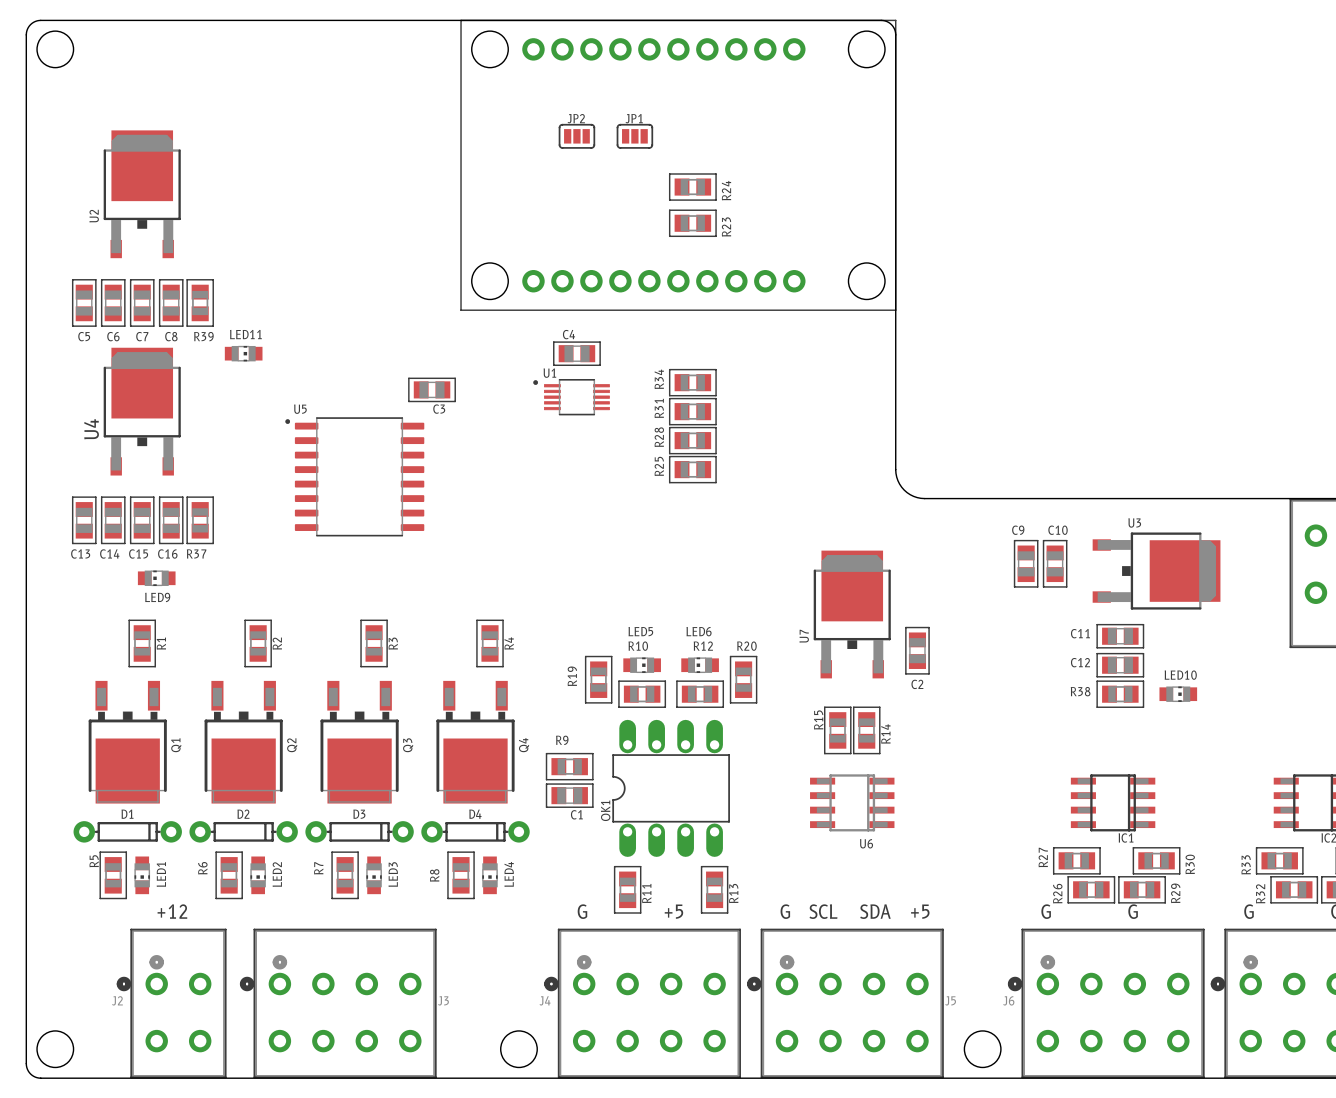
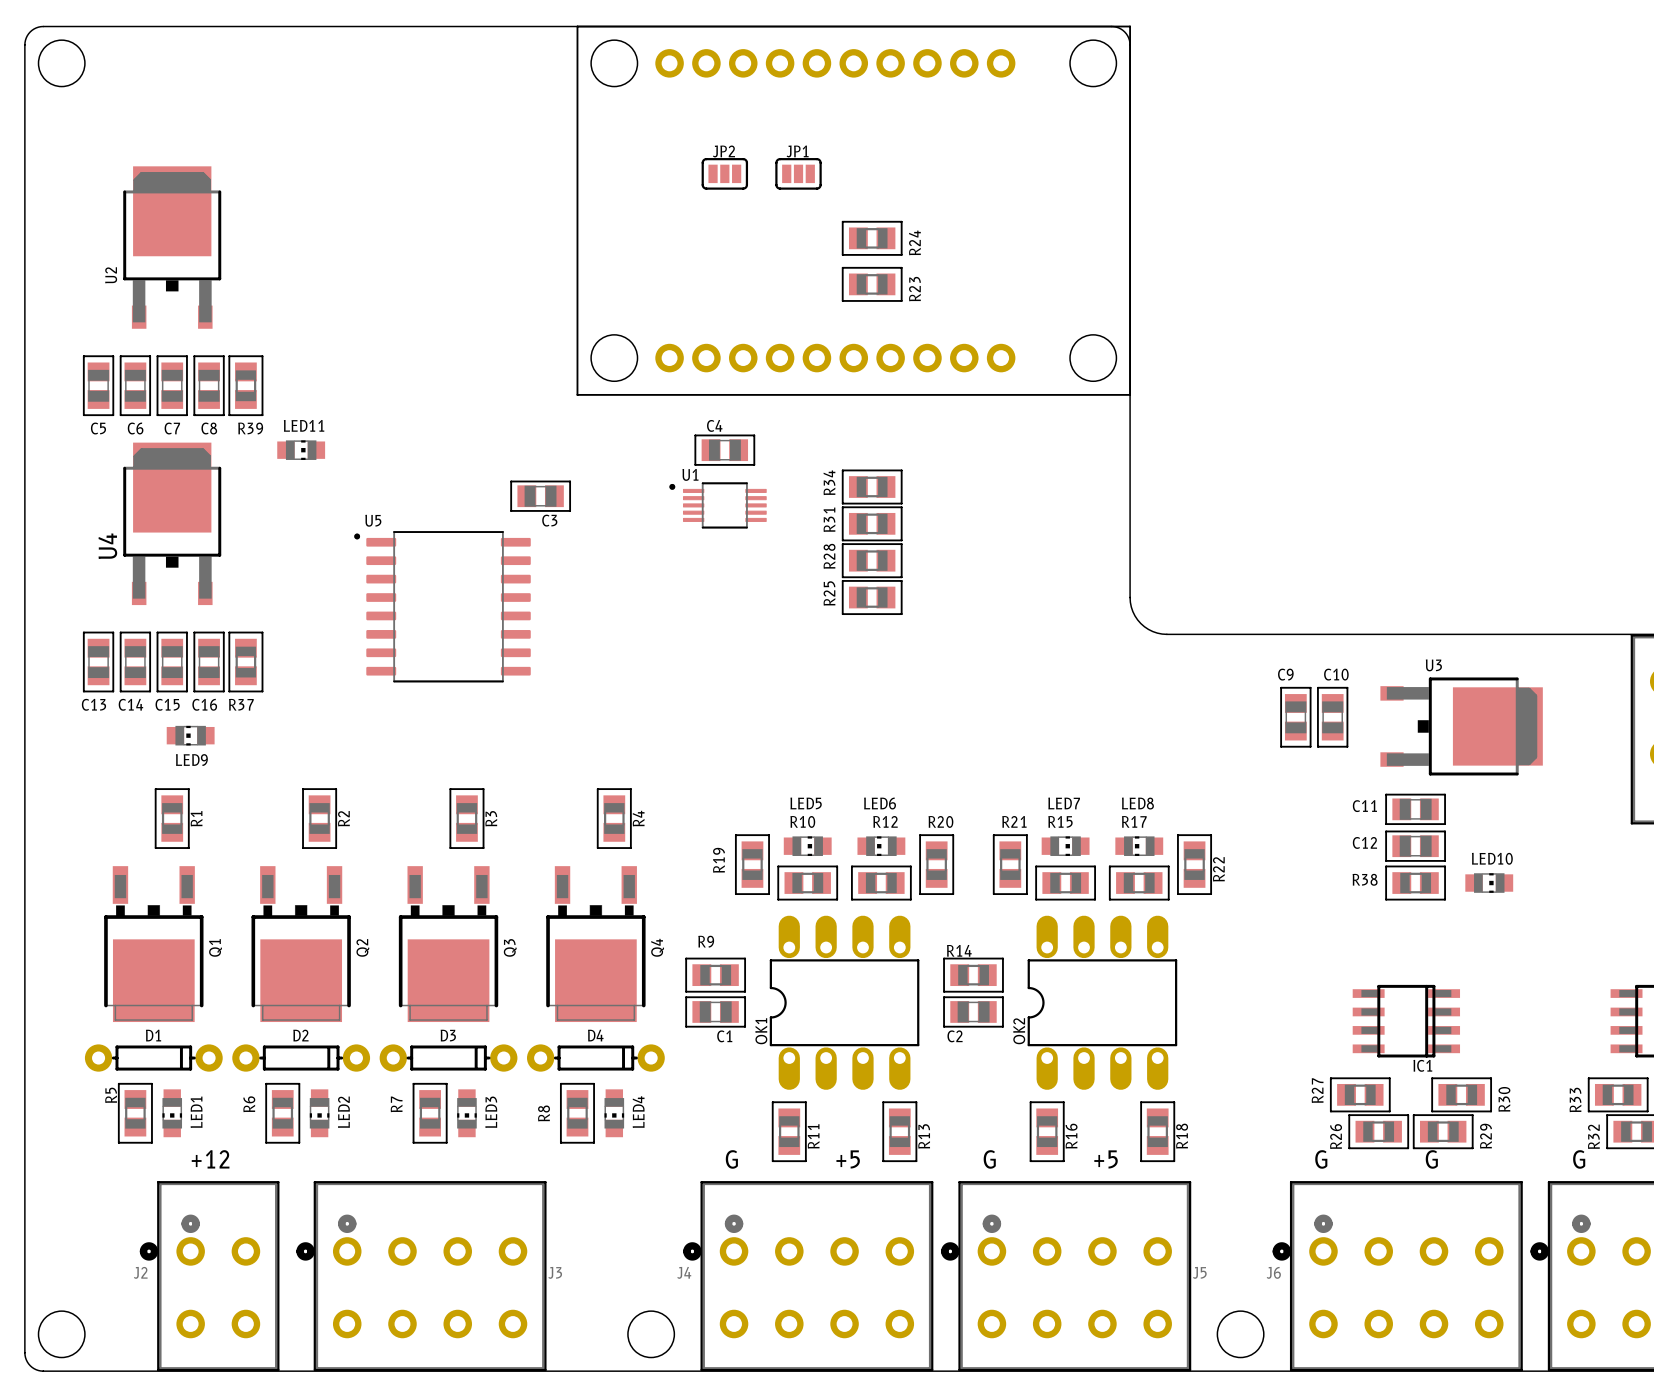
U7: (852, 614) -> none
C2 rotation: 0° (917, 650) -> 90° clockwise (973, 1011)
C2 position: (917, 650) -> (973, 1011)
LED7: none -> (1065, 846)
LED8: none -> (1139, 846)
R21: none -> (1010, 864)
R22: none -> (1194, 864)
R17: none -> (1139, 883)
R15 name position: R15 (818, 719) -> R15 (1060, 821)
R15 rotation: 0° (837, 730) -> 90° clockwise (1065, 883)
R15 position: (837, 730) -> (1065, 883)
R14 rotation: 0° (866, 730) -> 90° clockwise (973, 975)
R14 position: (866, 730) -> (973, 975)
R14 name position: R14 (885, 734) -> R14 (959, 950)
OK2: none -> (1102, 1002)
U6: (852, 802) -> none
R16: none -> (1047, 1131)
R18: none -> (1157, 1131)
text: SCL (823, 911) -> none
text: SDA (875, 911) -> none
text position: +5 (920, 911) -> +5 (1106, 1159)

